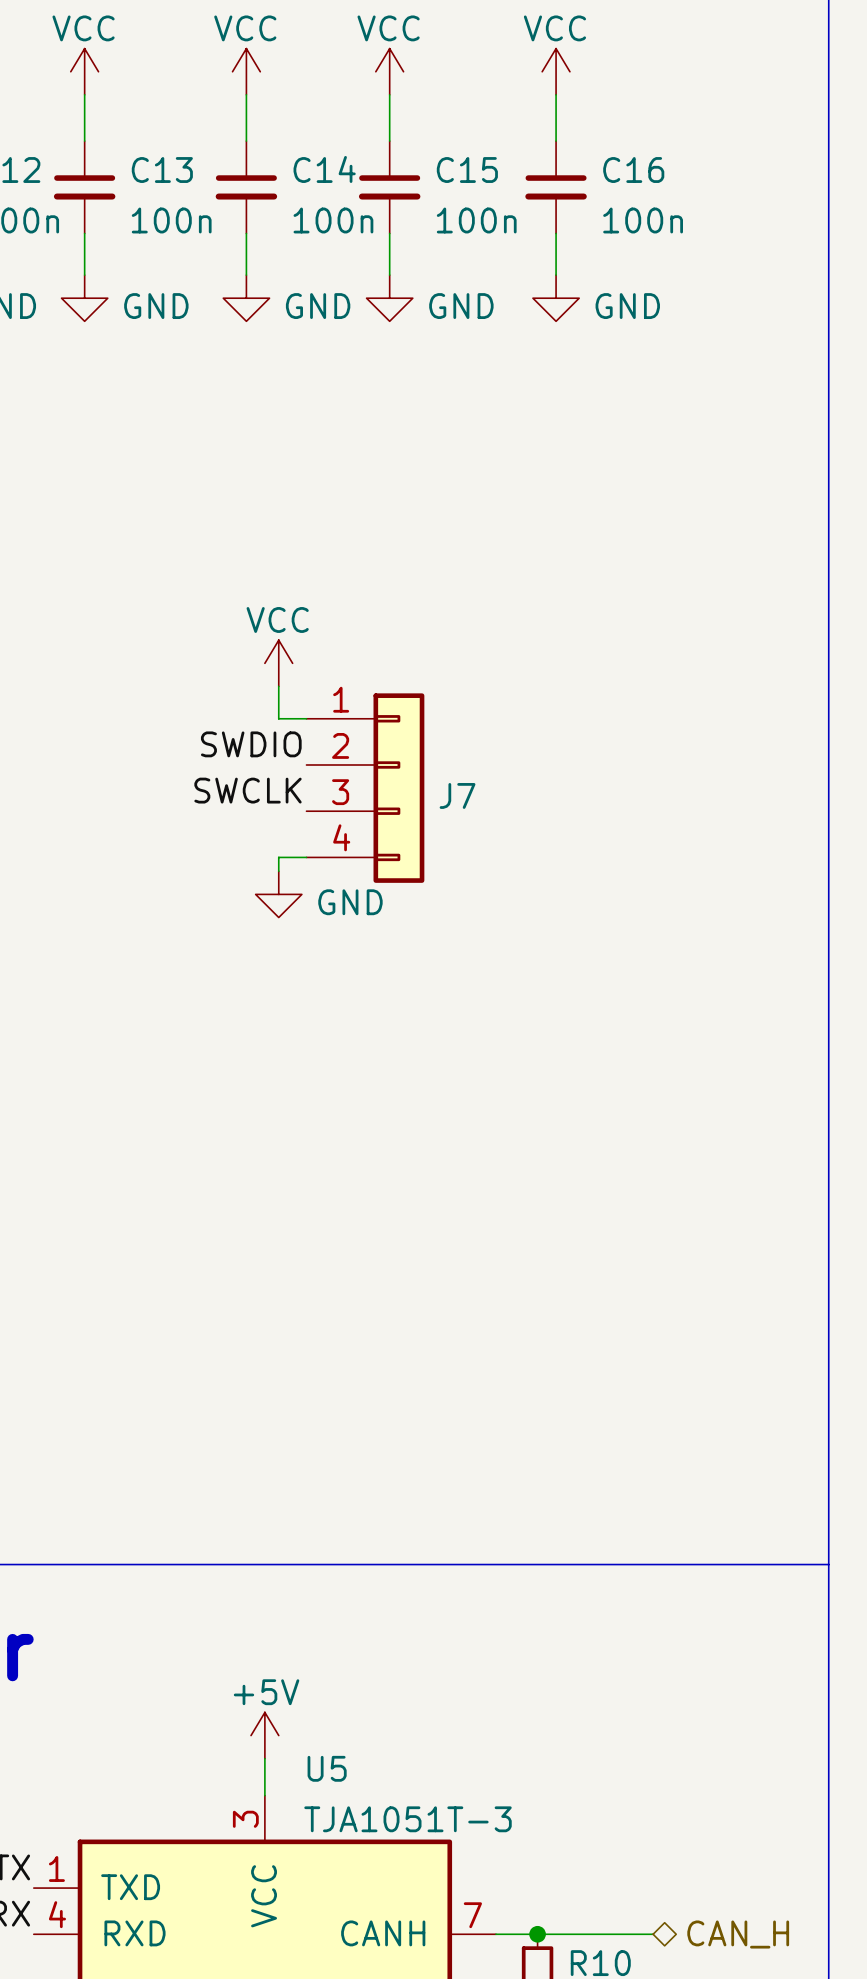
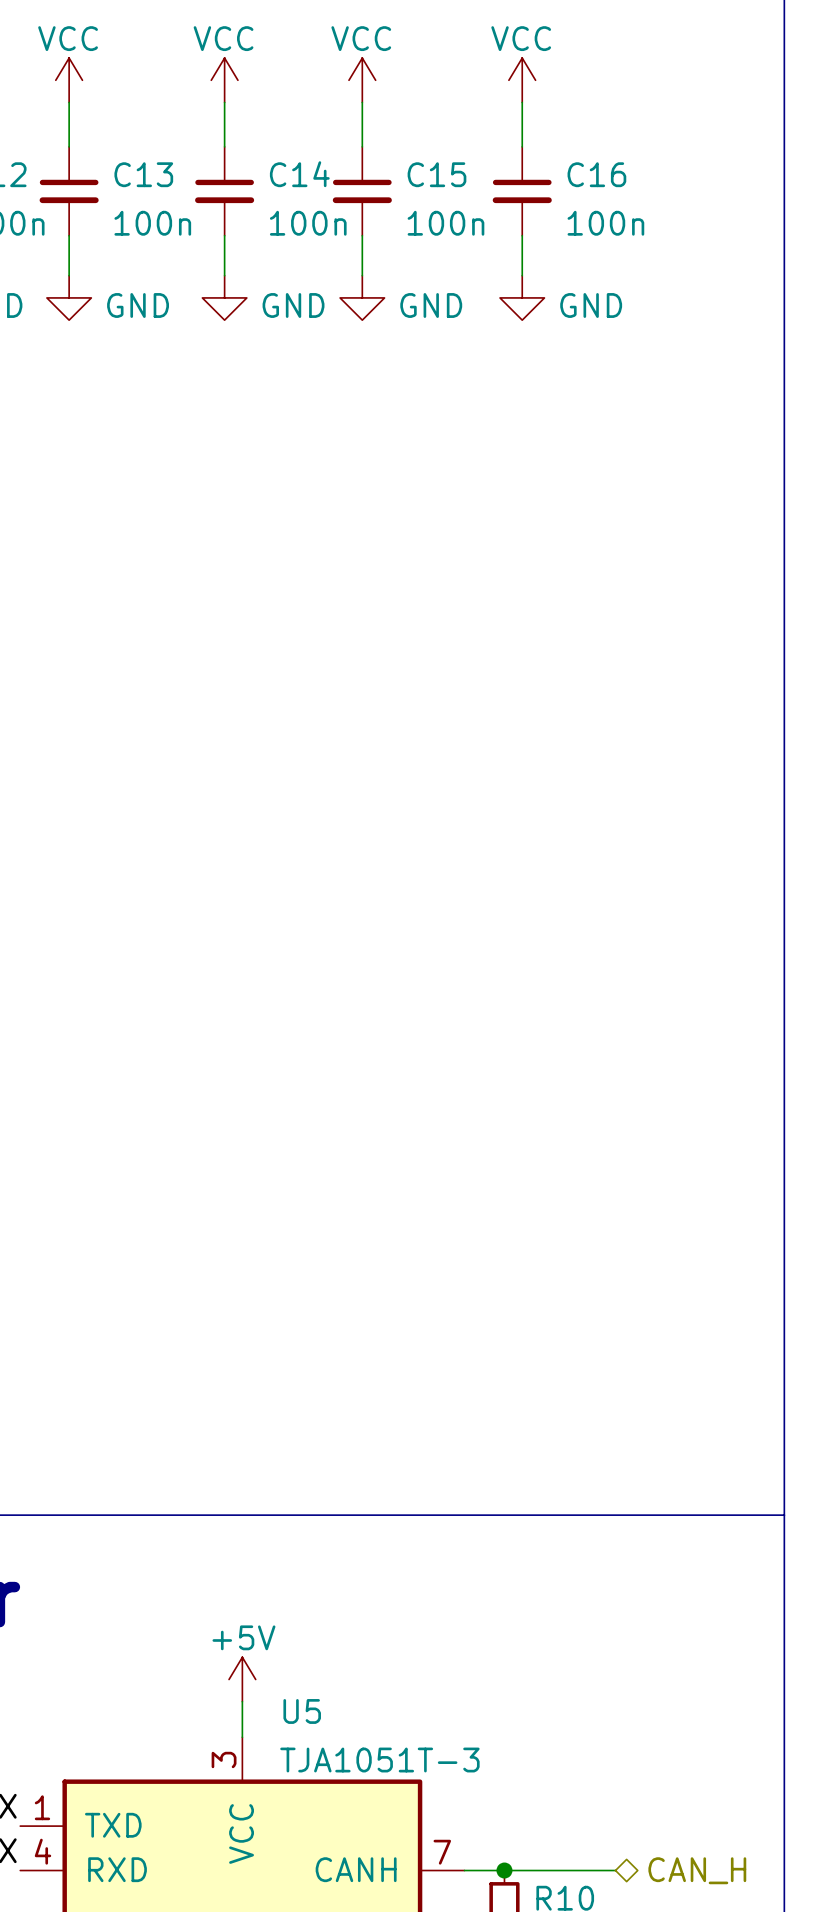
power symbol: VCC (278, 663) -> none
wire: (278, 686) (278, 718) (306, 718) -> none
label: SWDIO (251, 744) -> none
J7: (365, 788) -> none
label: SWCLK (247, 790) -> none
wire: (306, 857) (278, 857) (278, 871) -> none
power symbol: GND (278, 894) -> none

